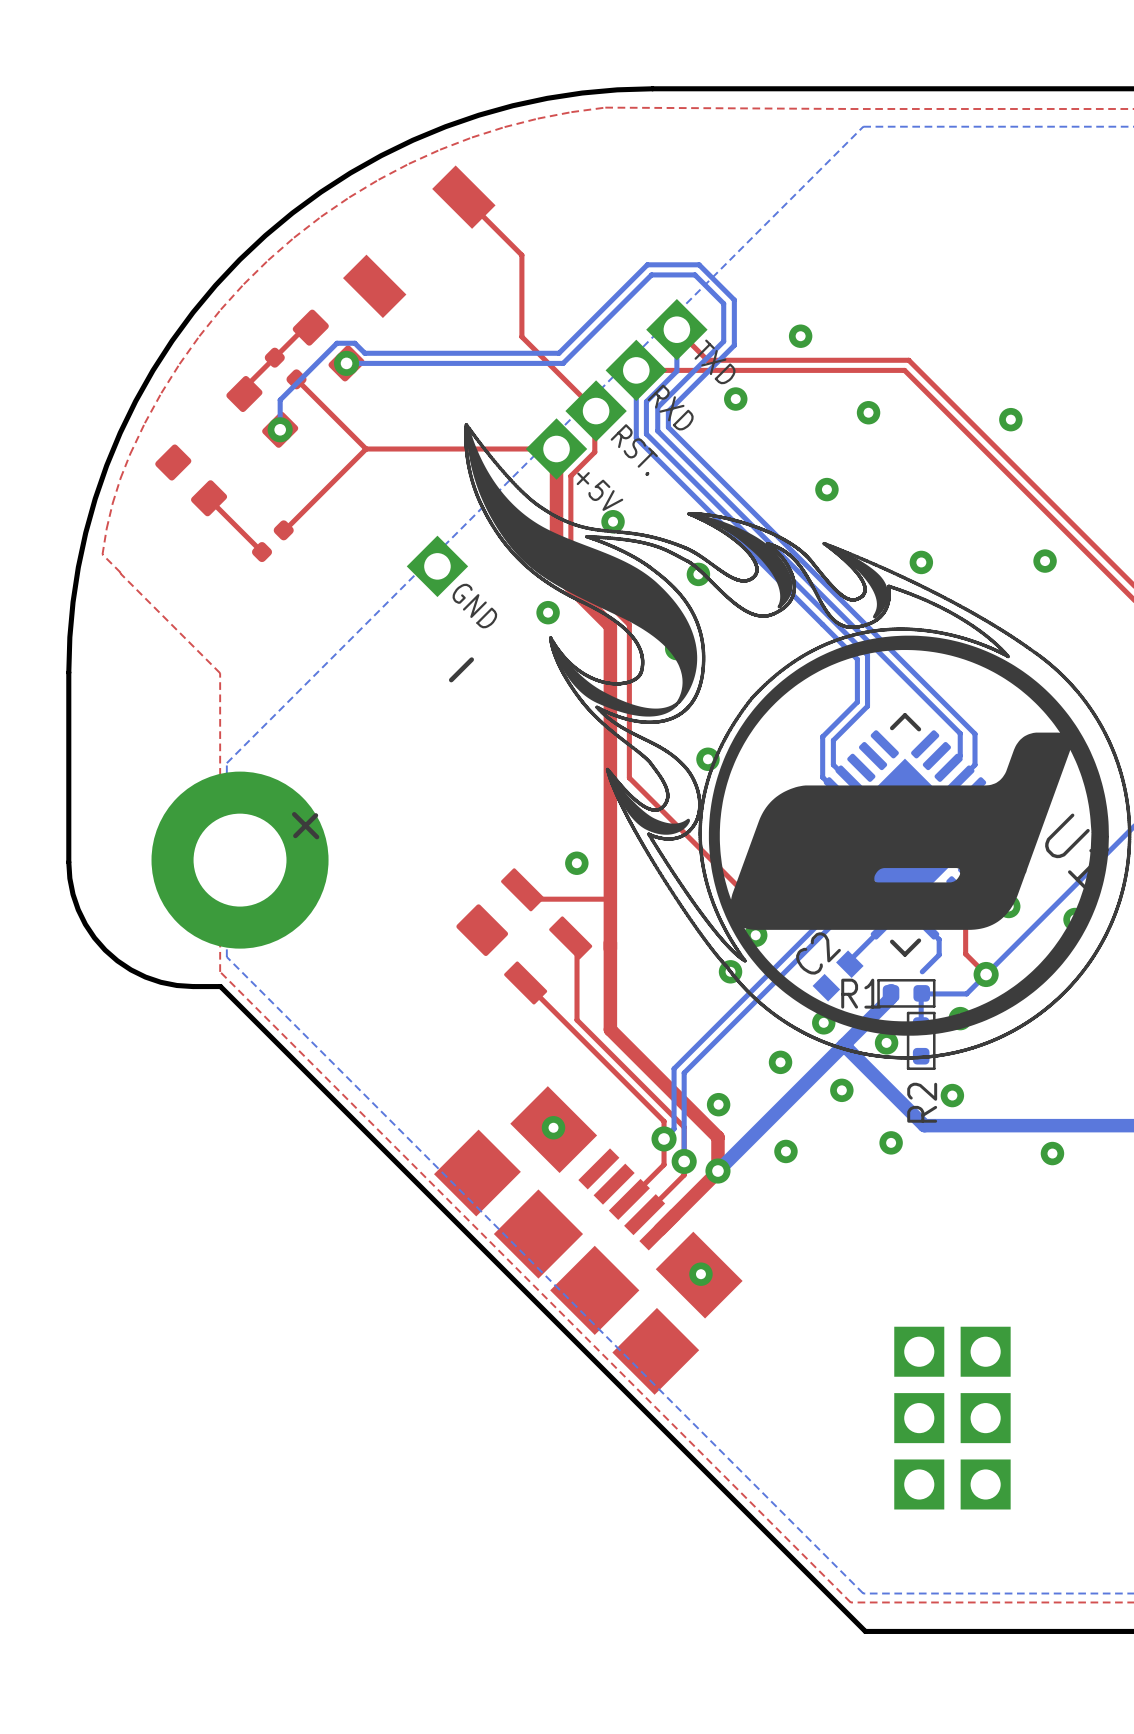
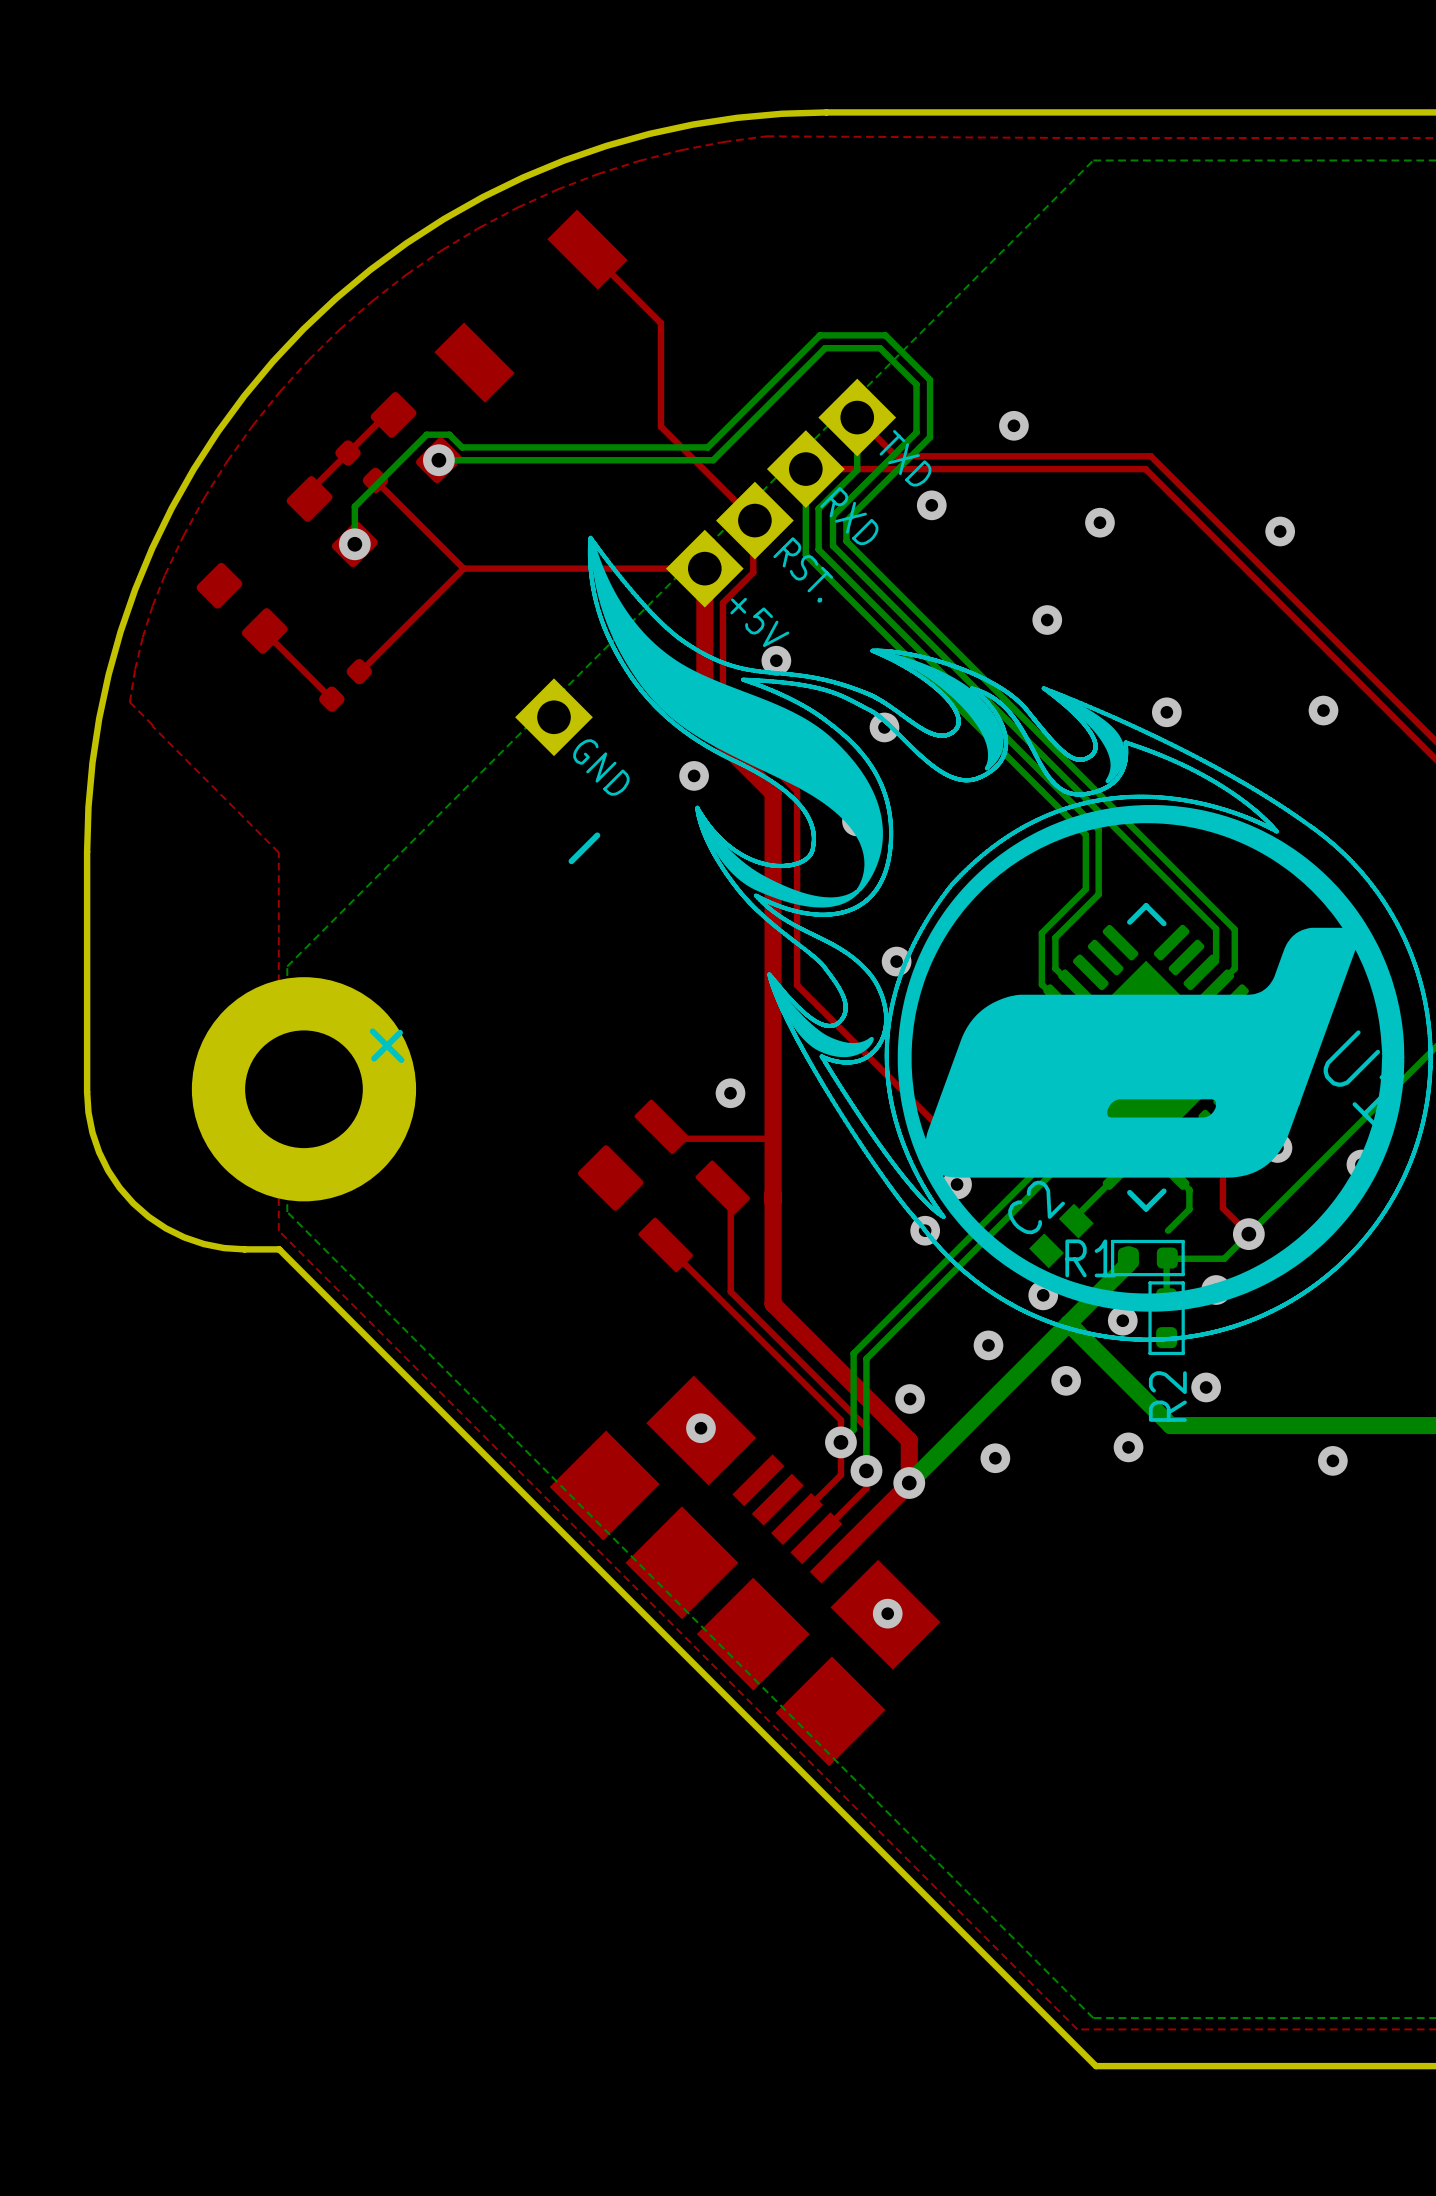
part: (952, 1418) -> none

